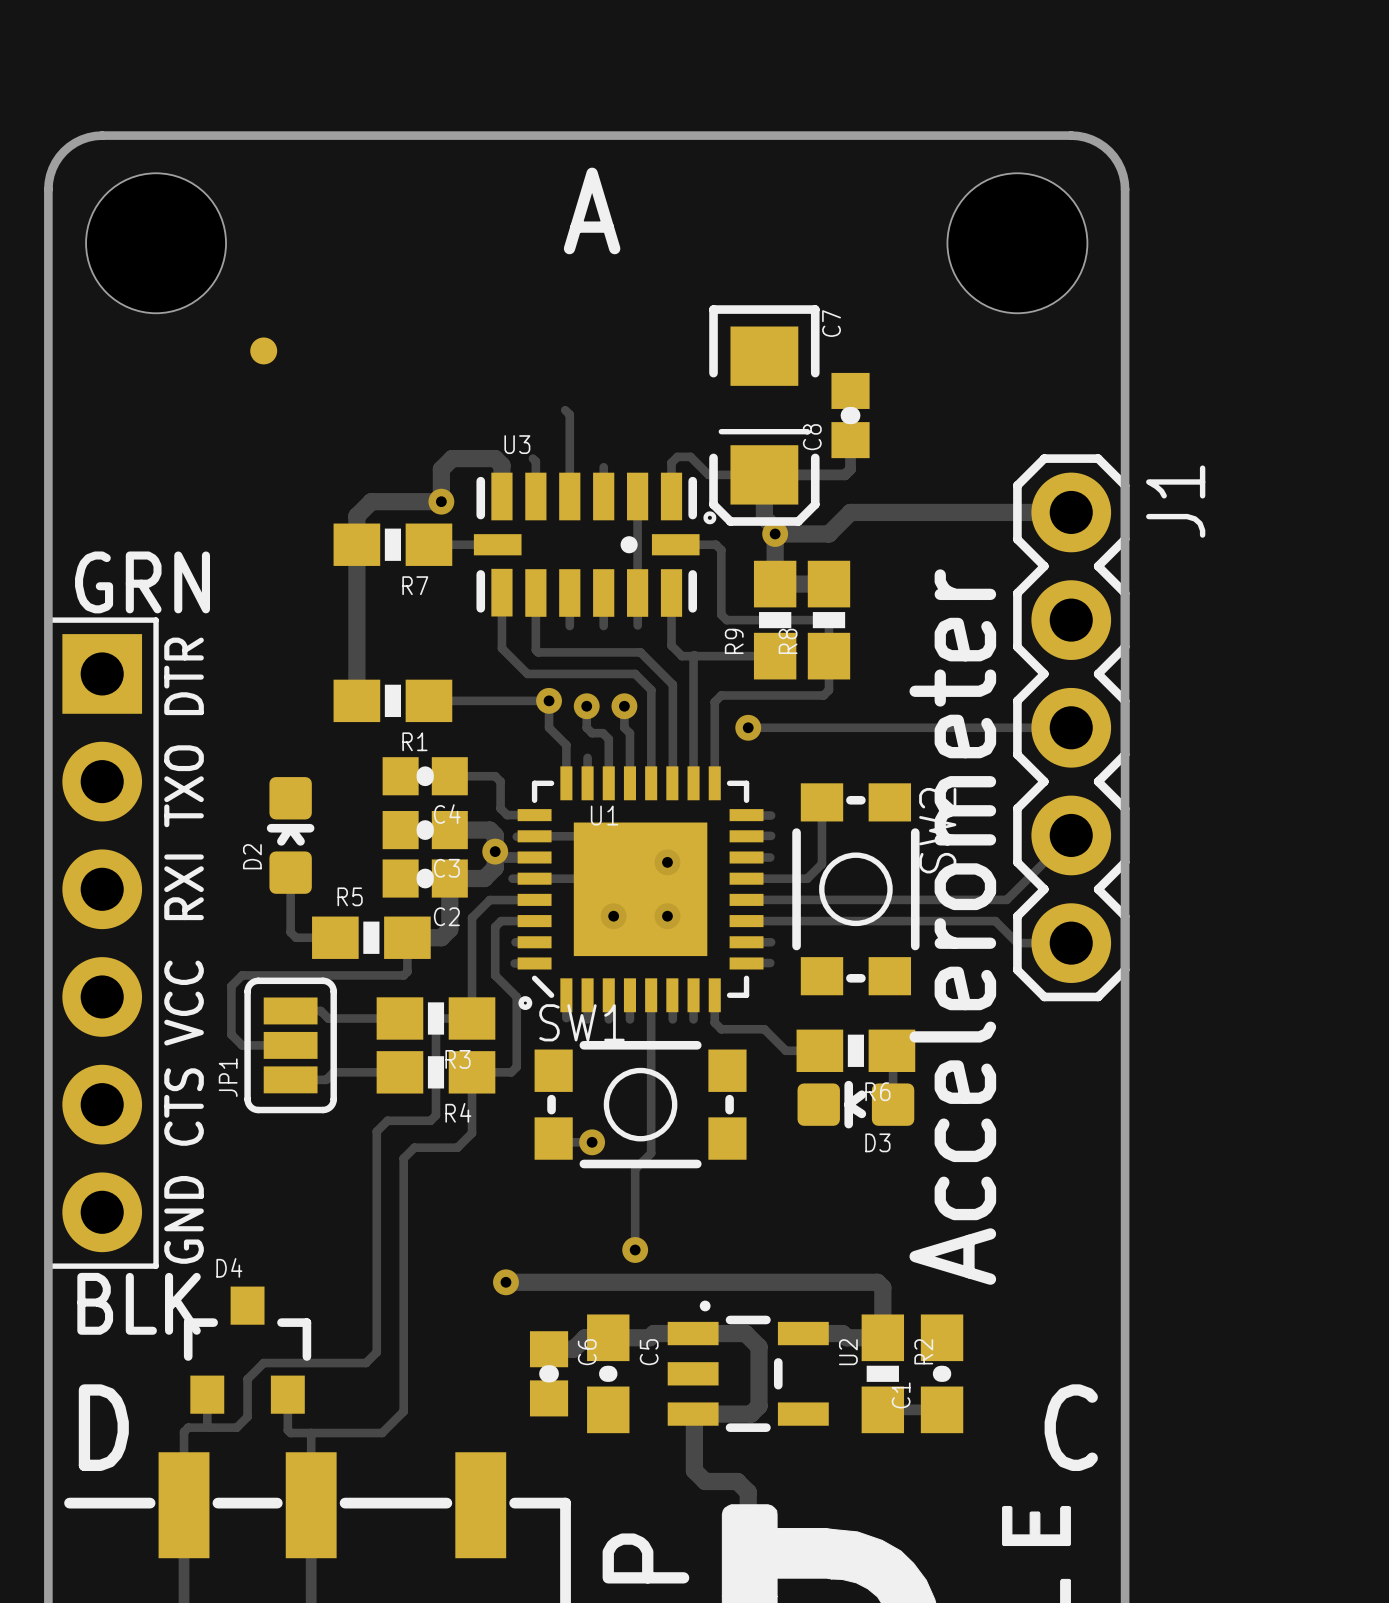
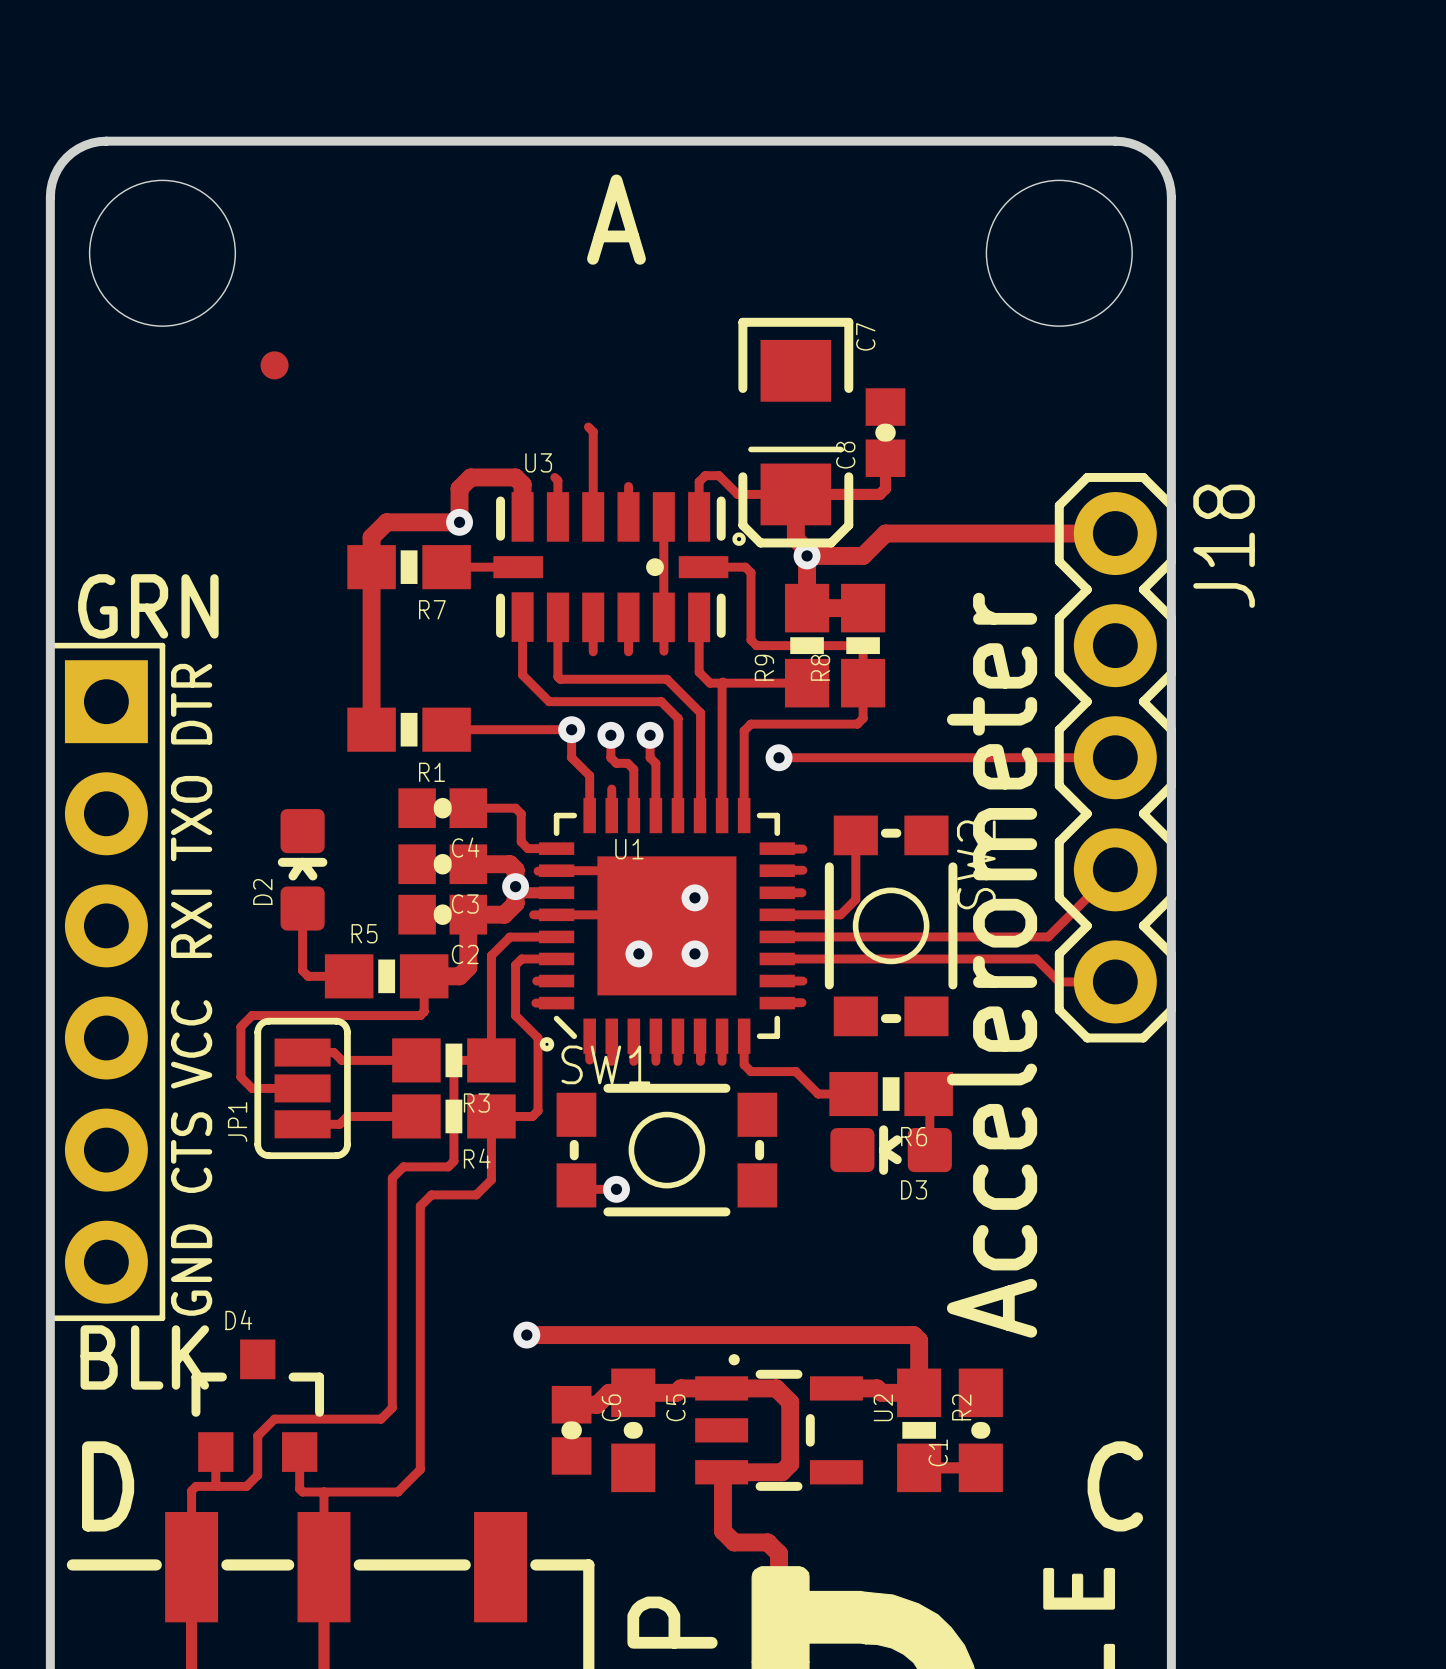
J1 name: J1 (1175, 501) -> J18 (1224, 546)
track: (651, 1019) (651, 1153) (635, 1169) (635, 1249) -> none
via: (635, 1249) -> none

